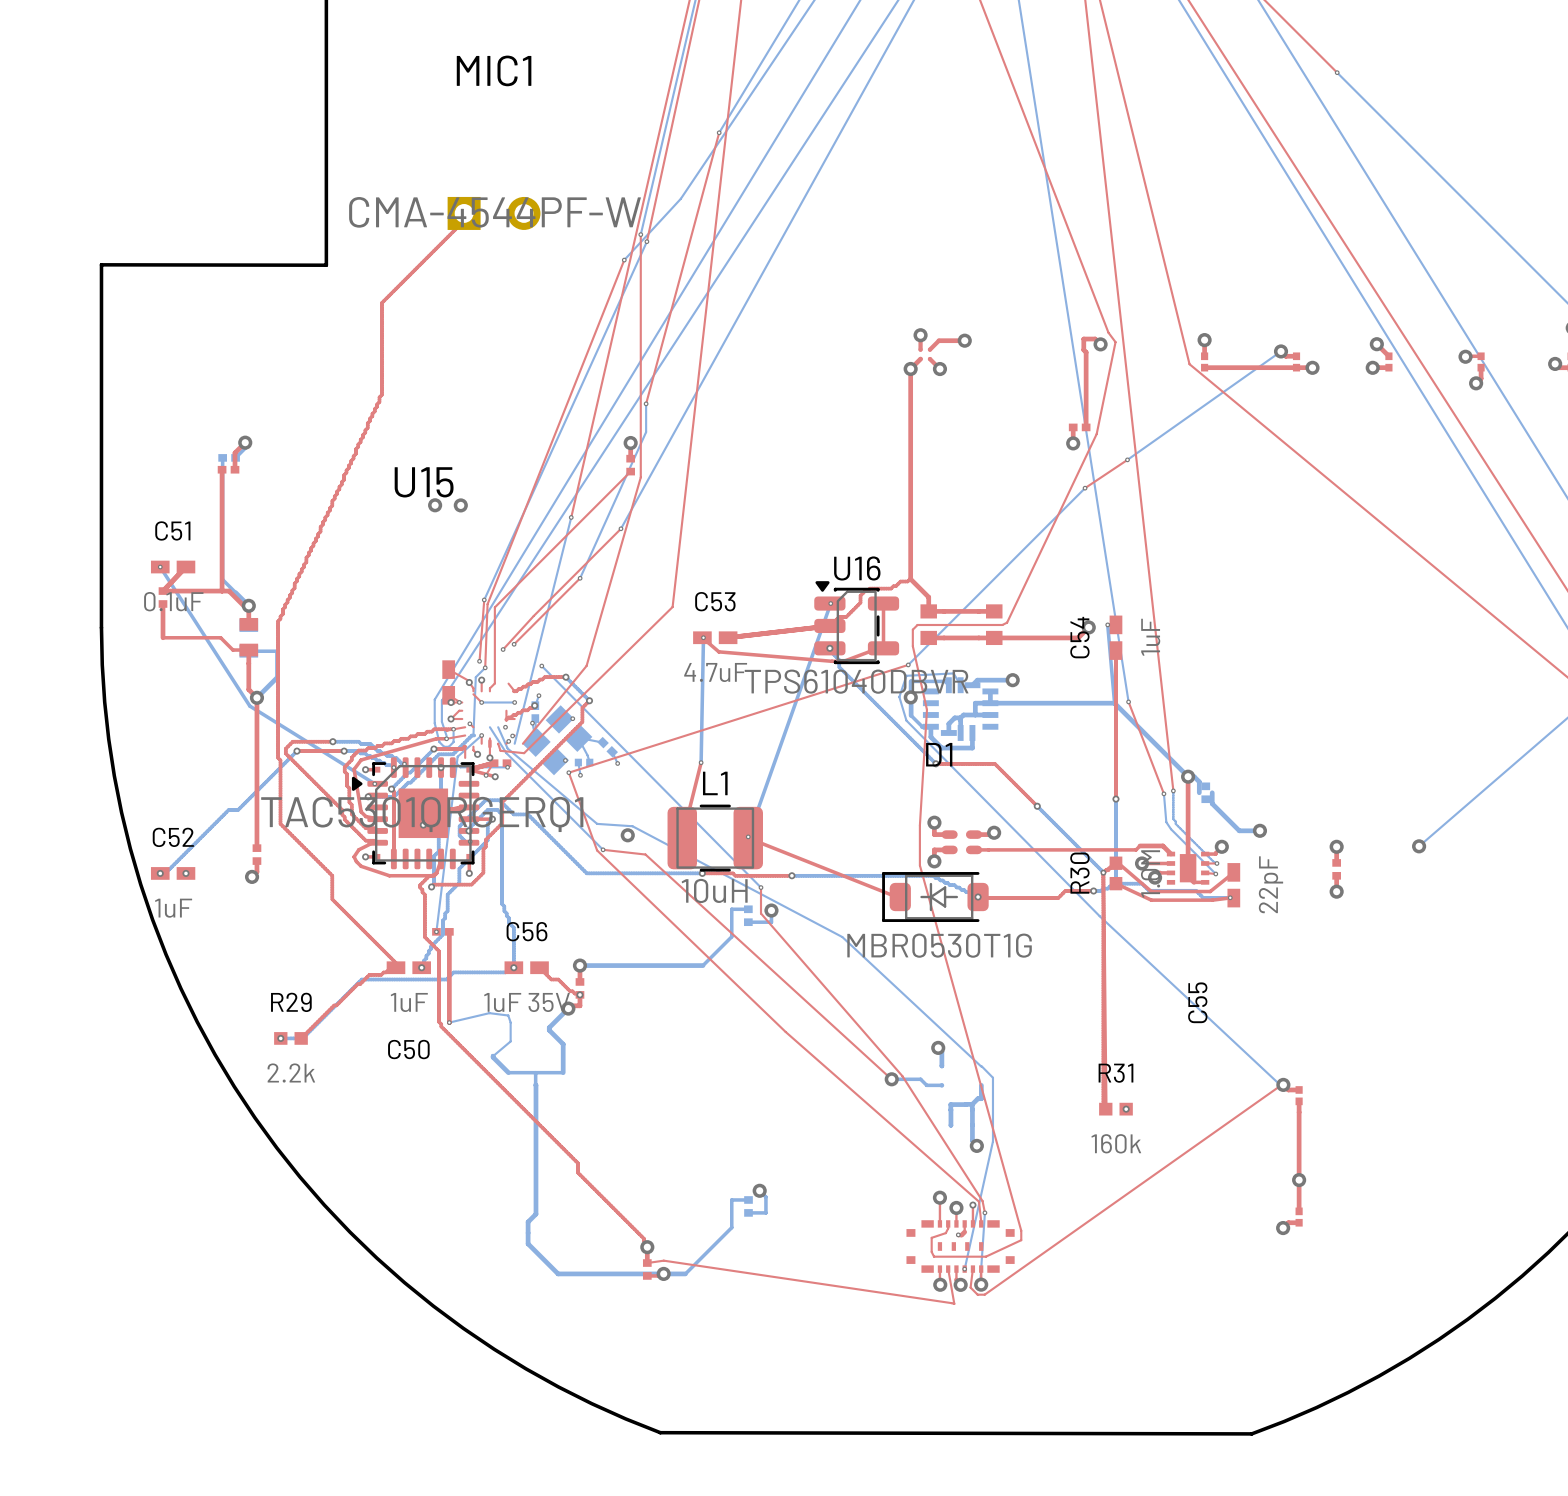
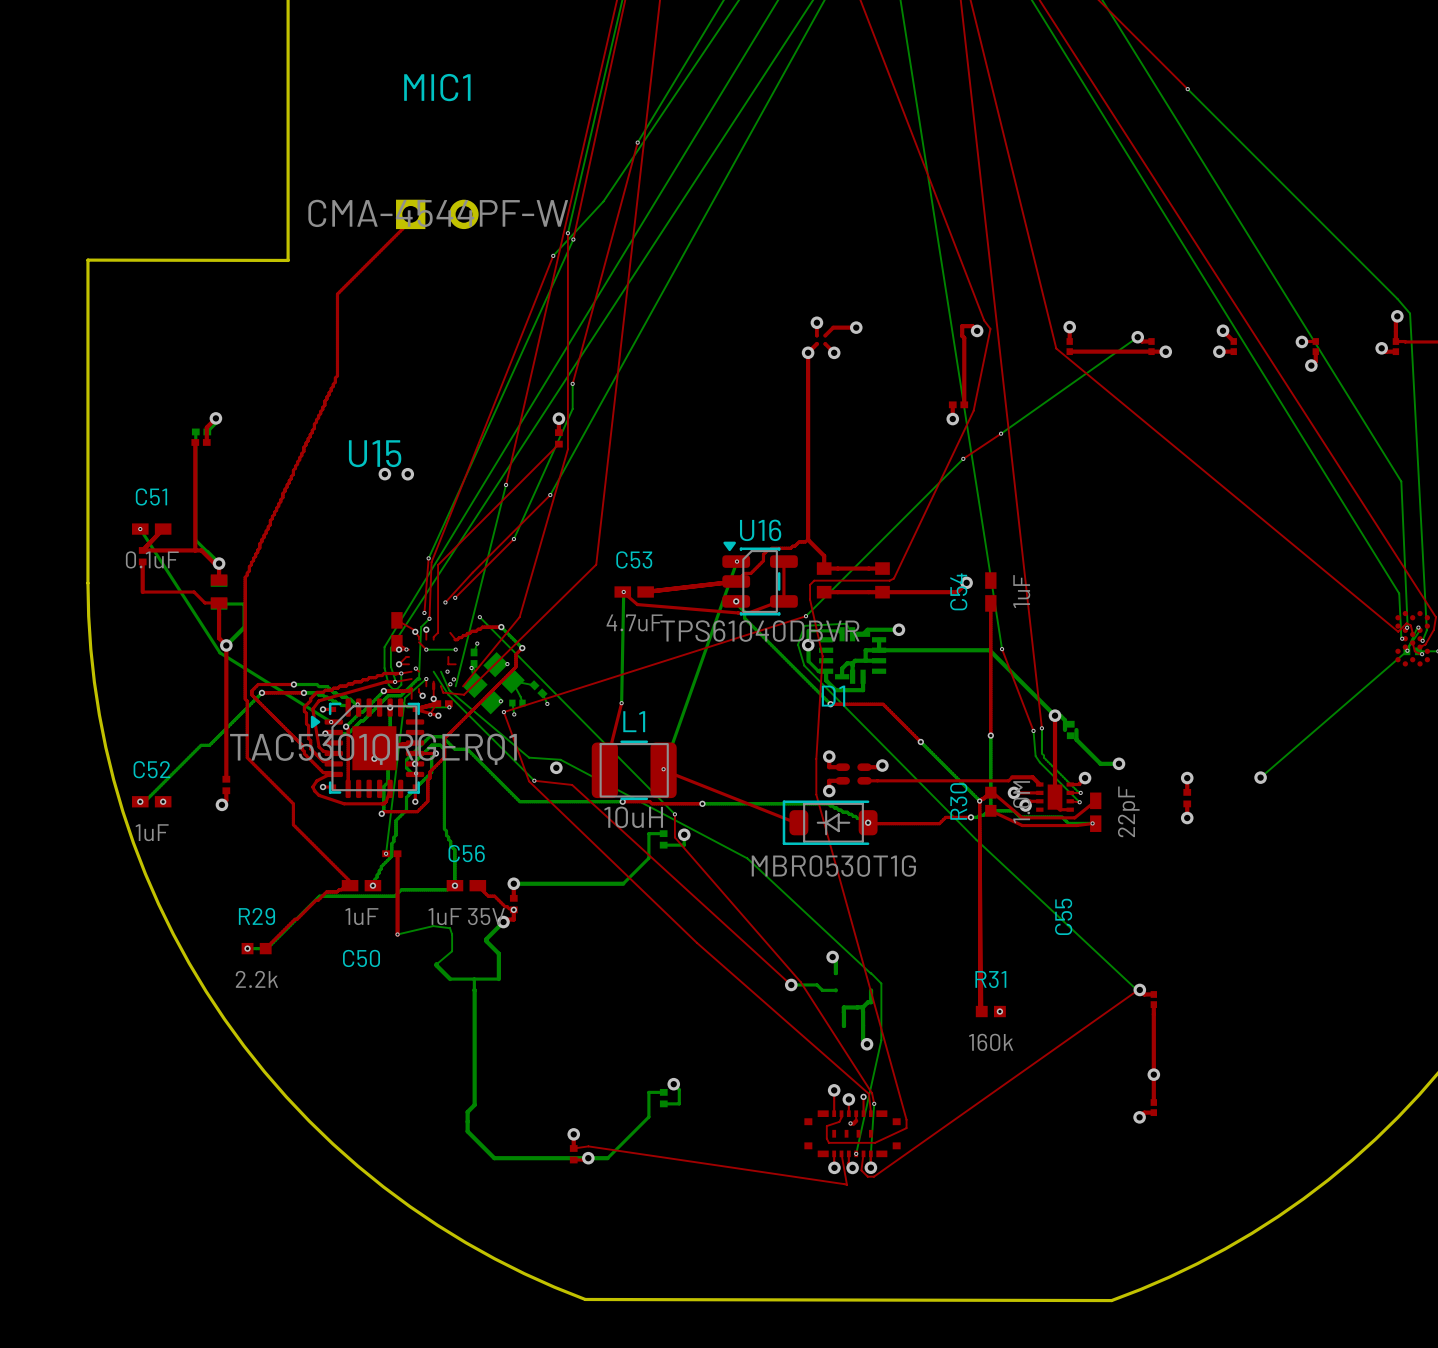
bottom track: (1107, 624) (1114, 703) -> none
via: (1107, 624) -> none
via: (534, 705) -> none
top track: (535, 705) (506, 719) -> none
via: (393, 767) -> none
top track: (429, 875) (420, 887) (424, 894) (424, 937) (438, 951) (438, 1021) (441, 1026) (578, 1163) (578, 1172) (644, 1238) (647, 1247) -> none

